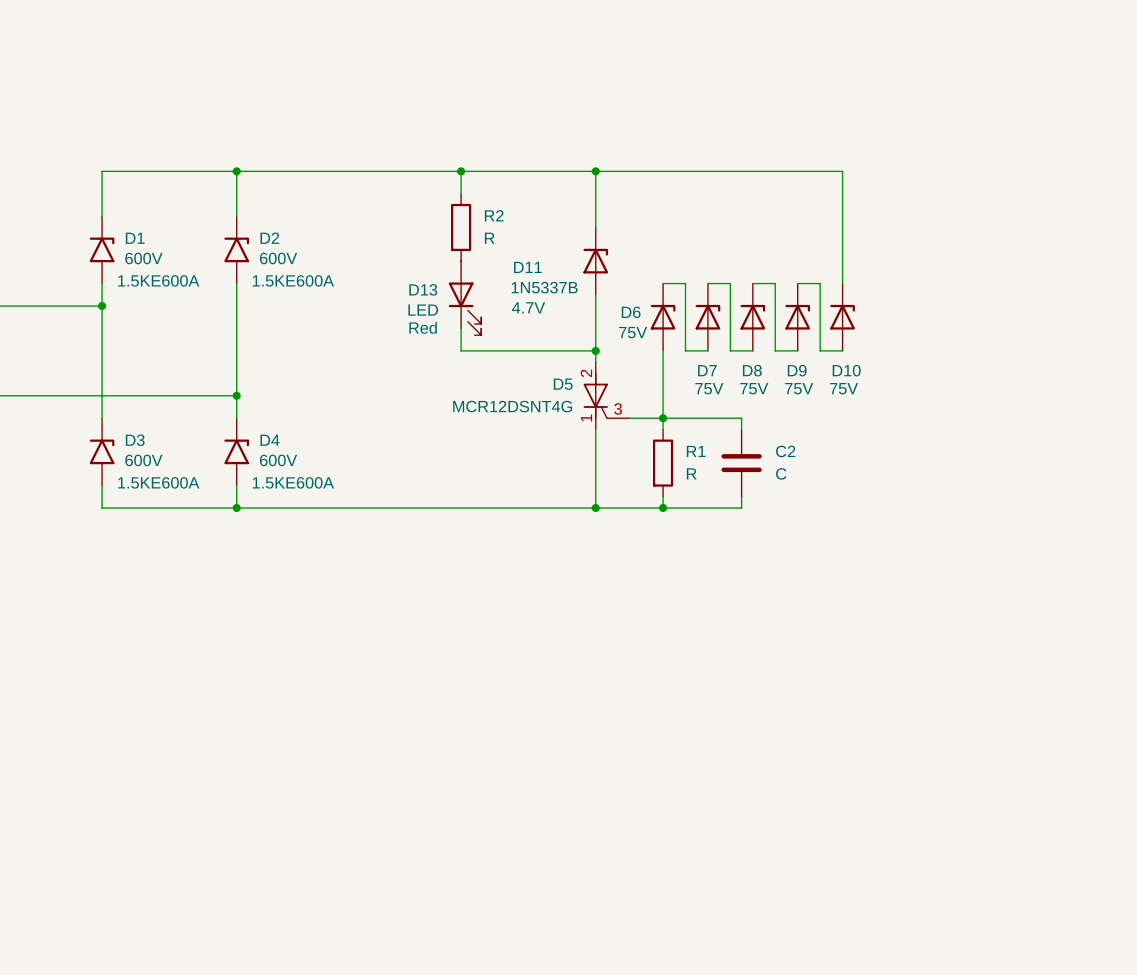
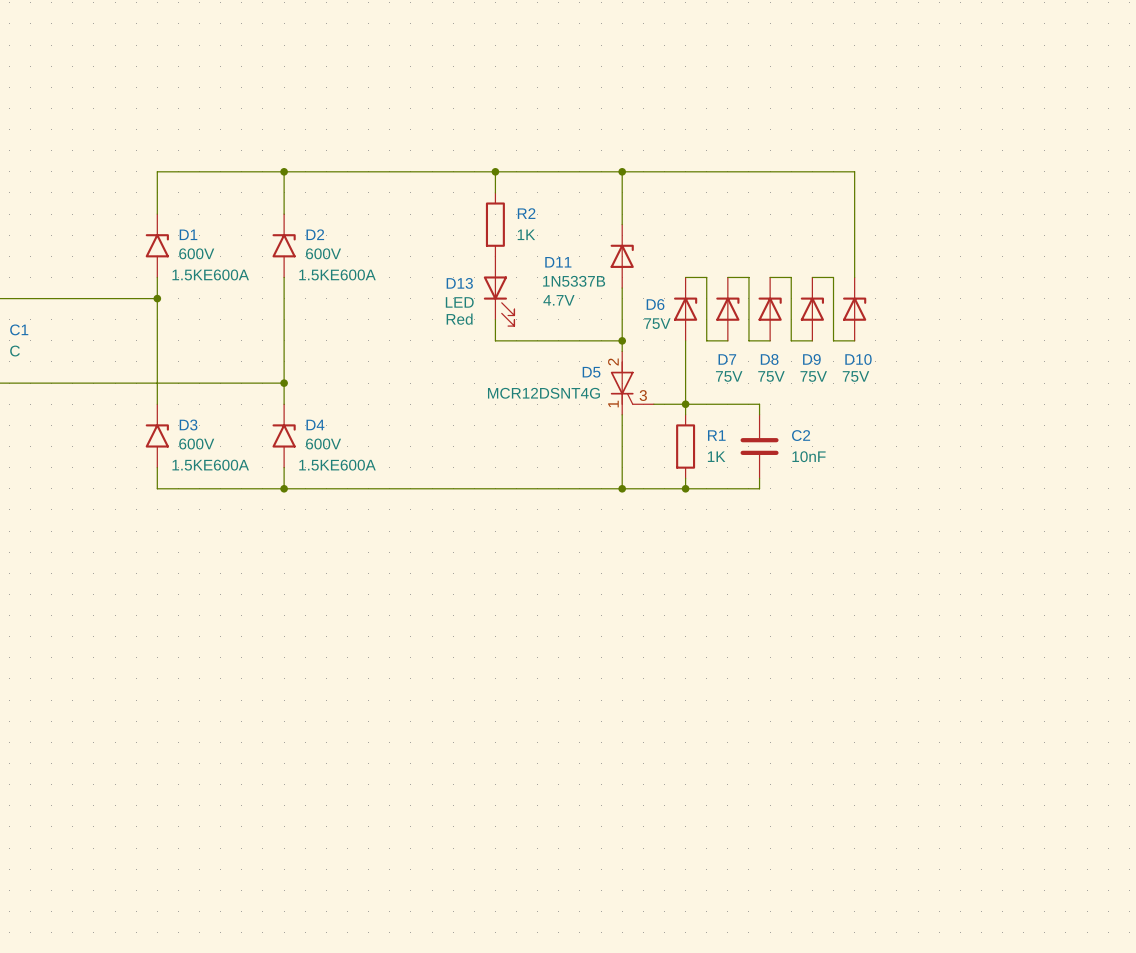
R2 value: R (489, 238) -> 1K (526, 234)
R1 value: R (691, 473) -> 1K (716, 456)
C2 value: C (781, 473) -> 10nF (809, 456)

